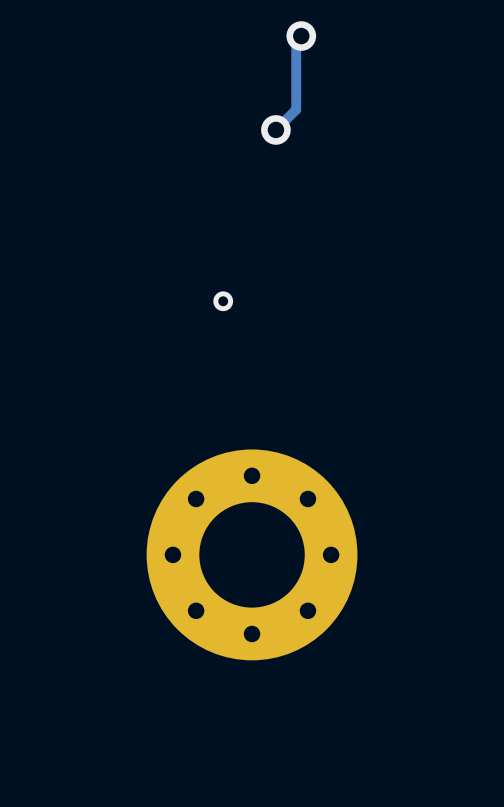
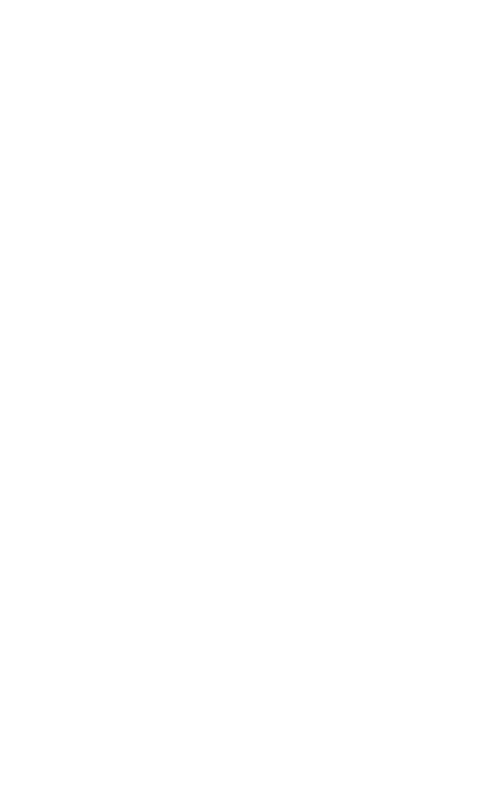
track: (301, 36) (296, 41) (296, 109) (275, 129) -> none
via: (301, 36) -> none
via: (275, 129) -> none
via: (223, 301) -> none
part: (252, 554) -> none

